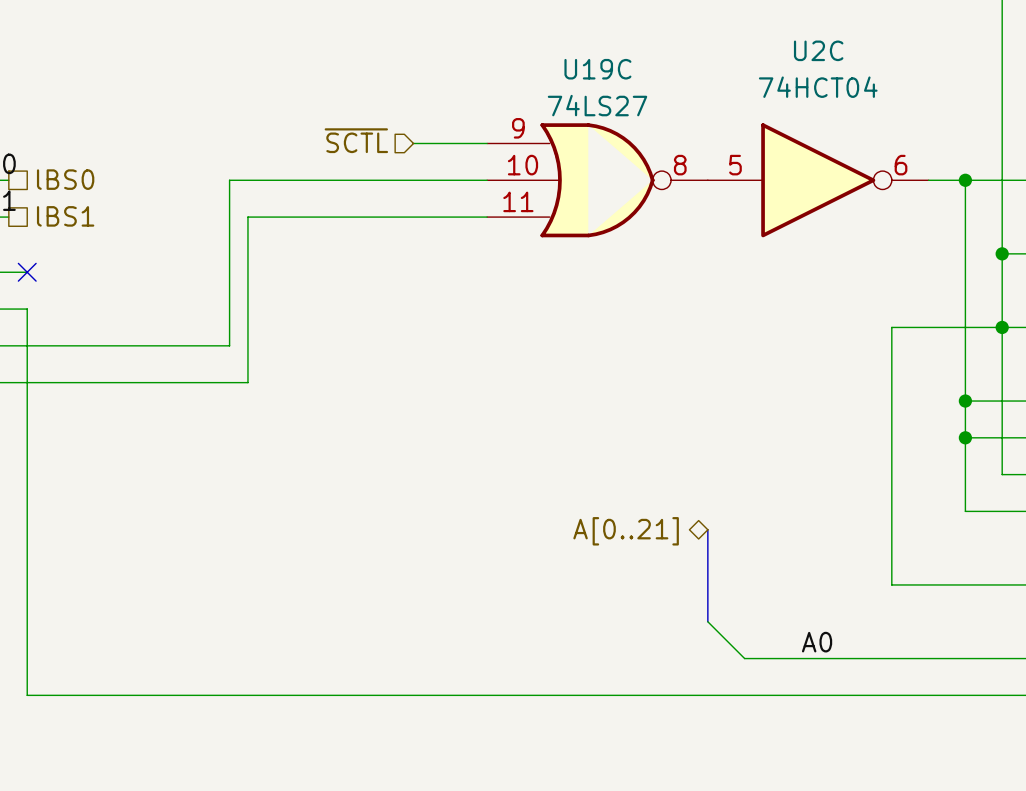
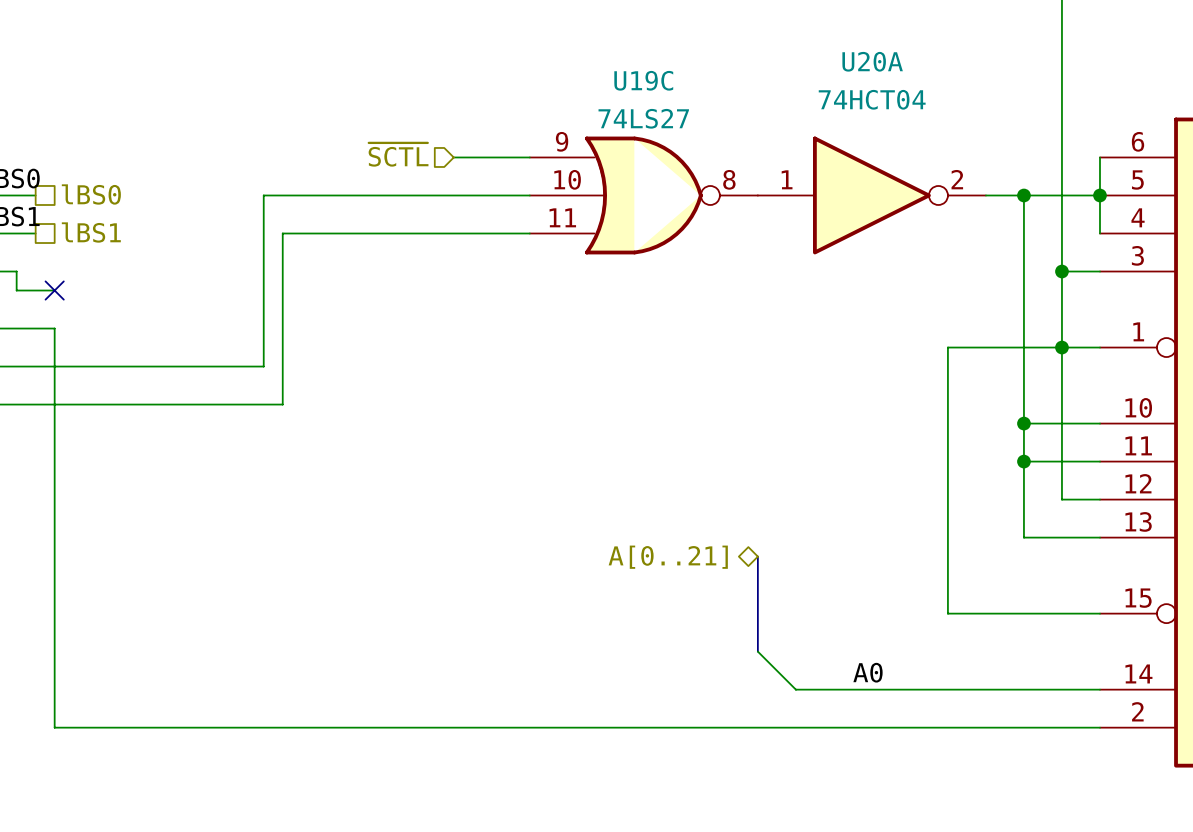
U2C name: U2C (818, 50) -> U20A (872, 61)
U2C pin number: 5 (735, 165) -> 1 (787, 179)
U2C pin number: 6 (901, 165) -> 2 (957, 179)

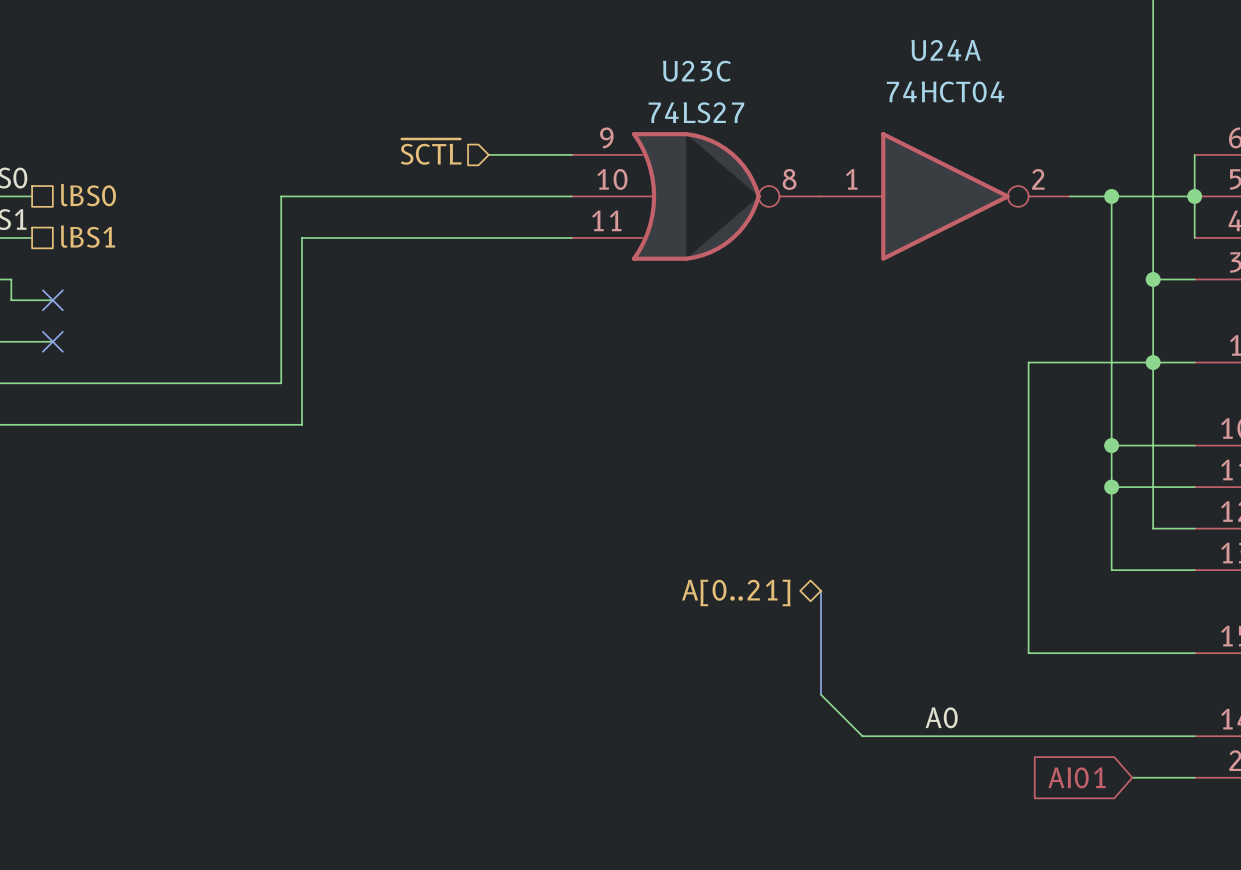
U20A name: U20A (872, 61) -> U24A (946, 50)
U19C name: U19C (643, 80) -> U23C (696, 71)
wire: (54, 328) (54, 727) (1042, 727) -> none
no-connect mark: none -> (52, 341)
global label: none -> AI01 (1077, 777)

